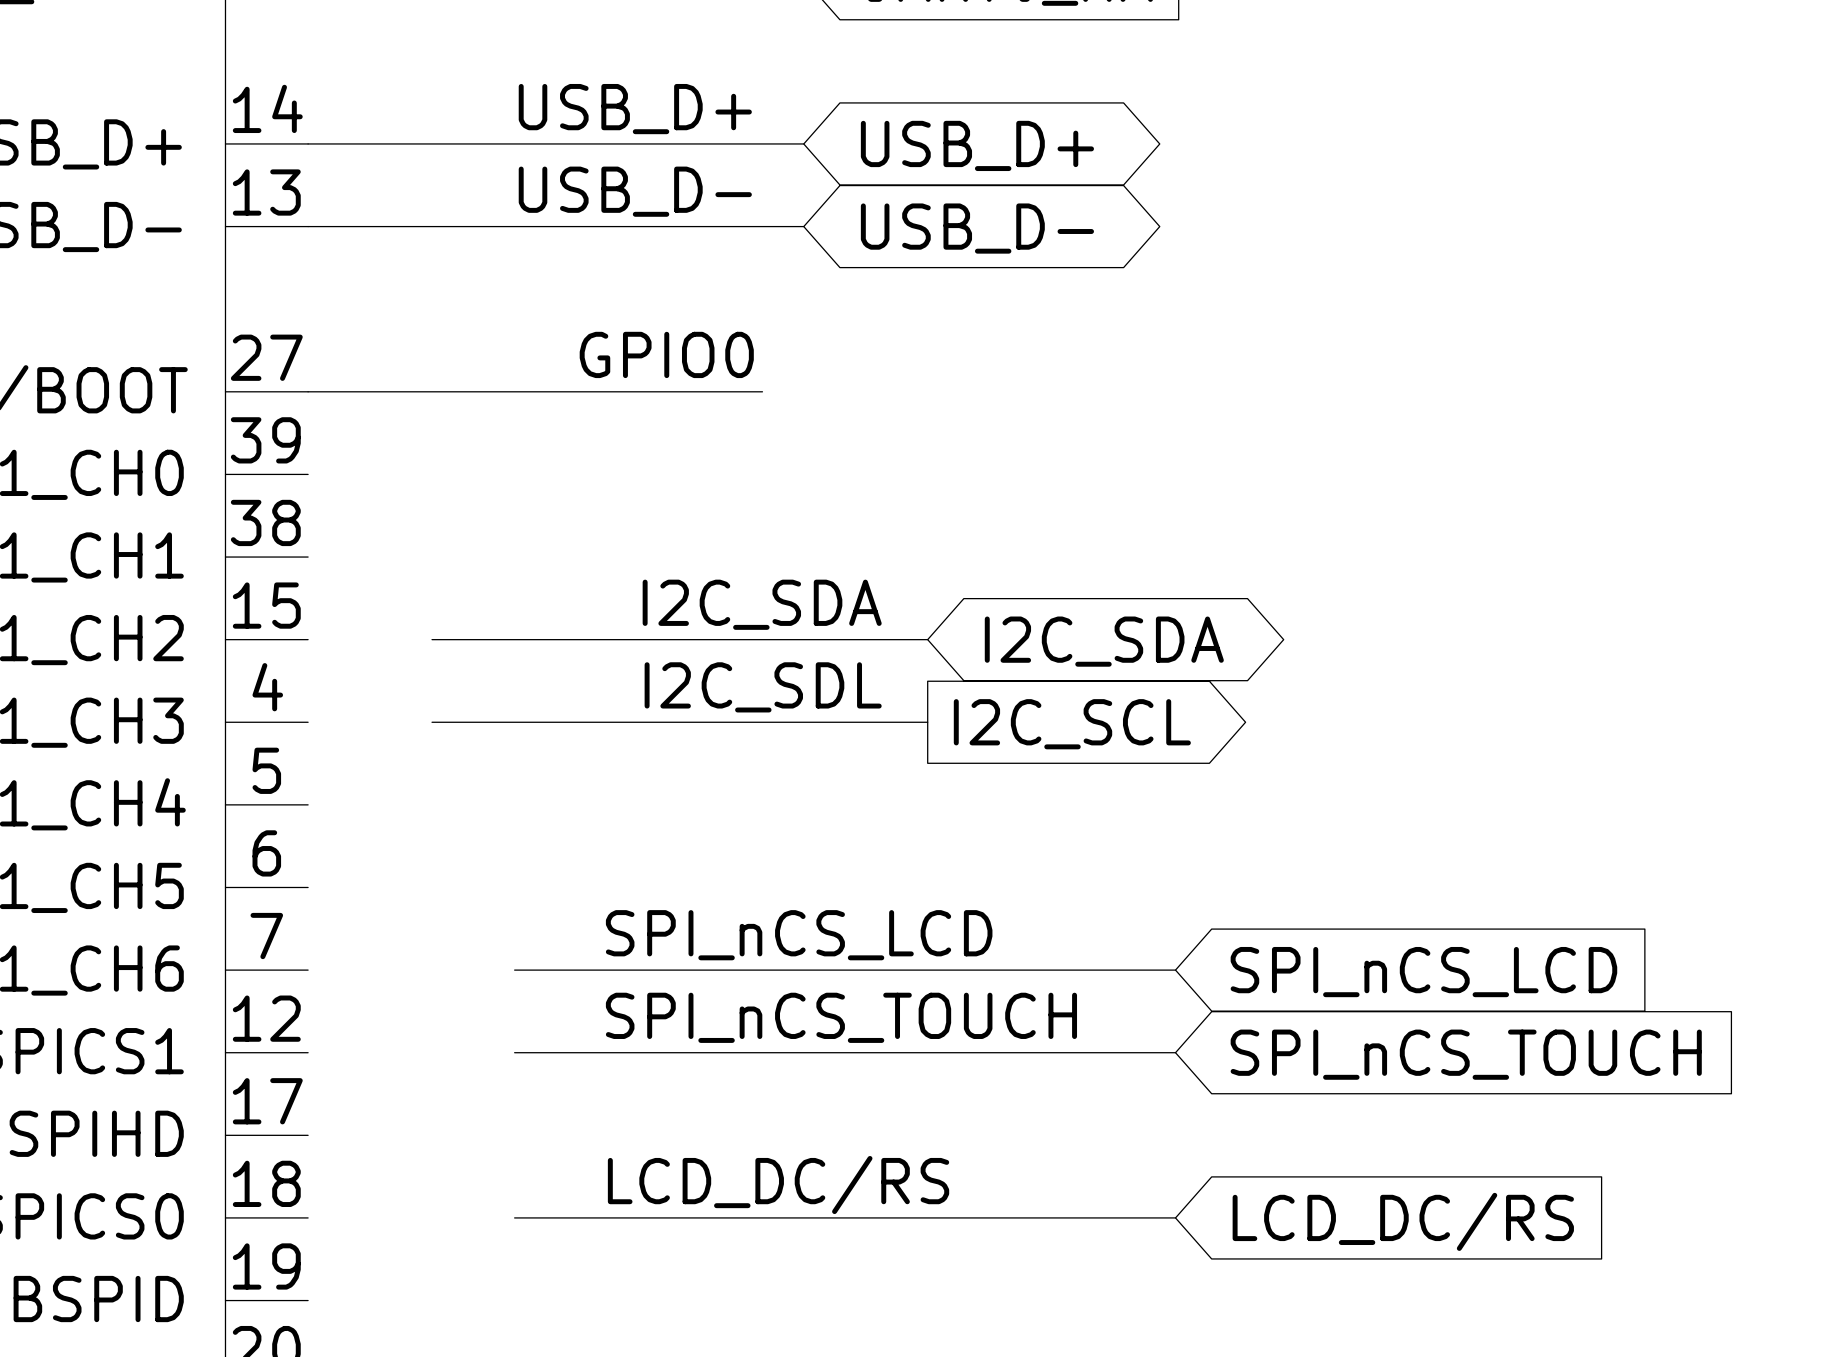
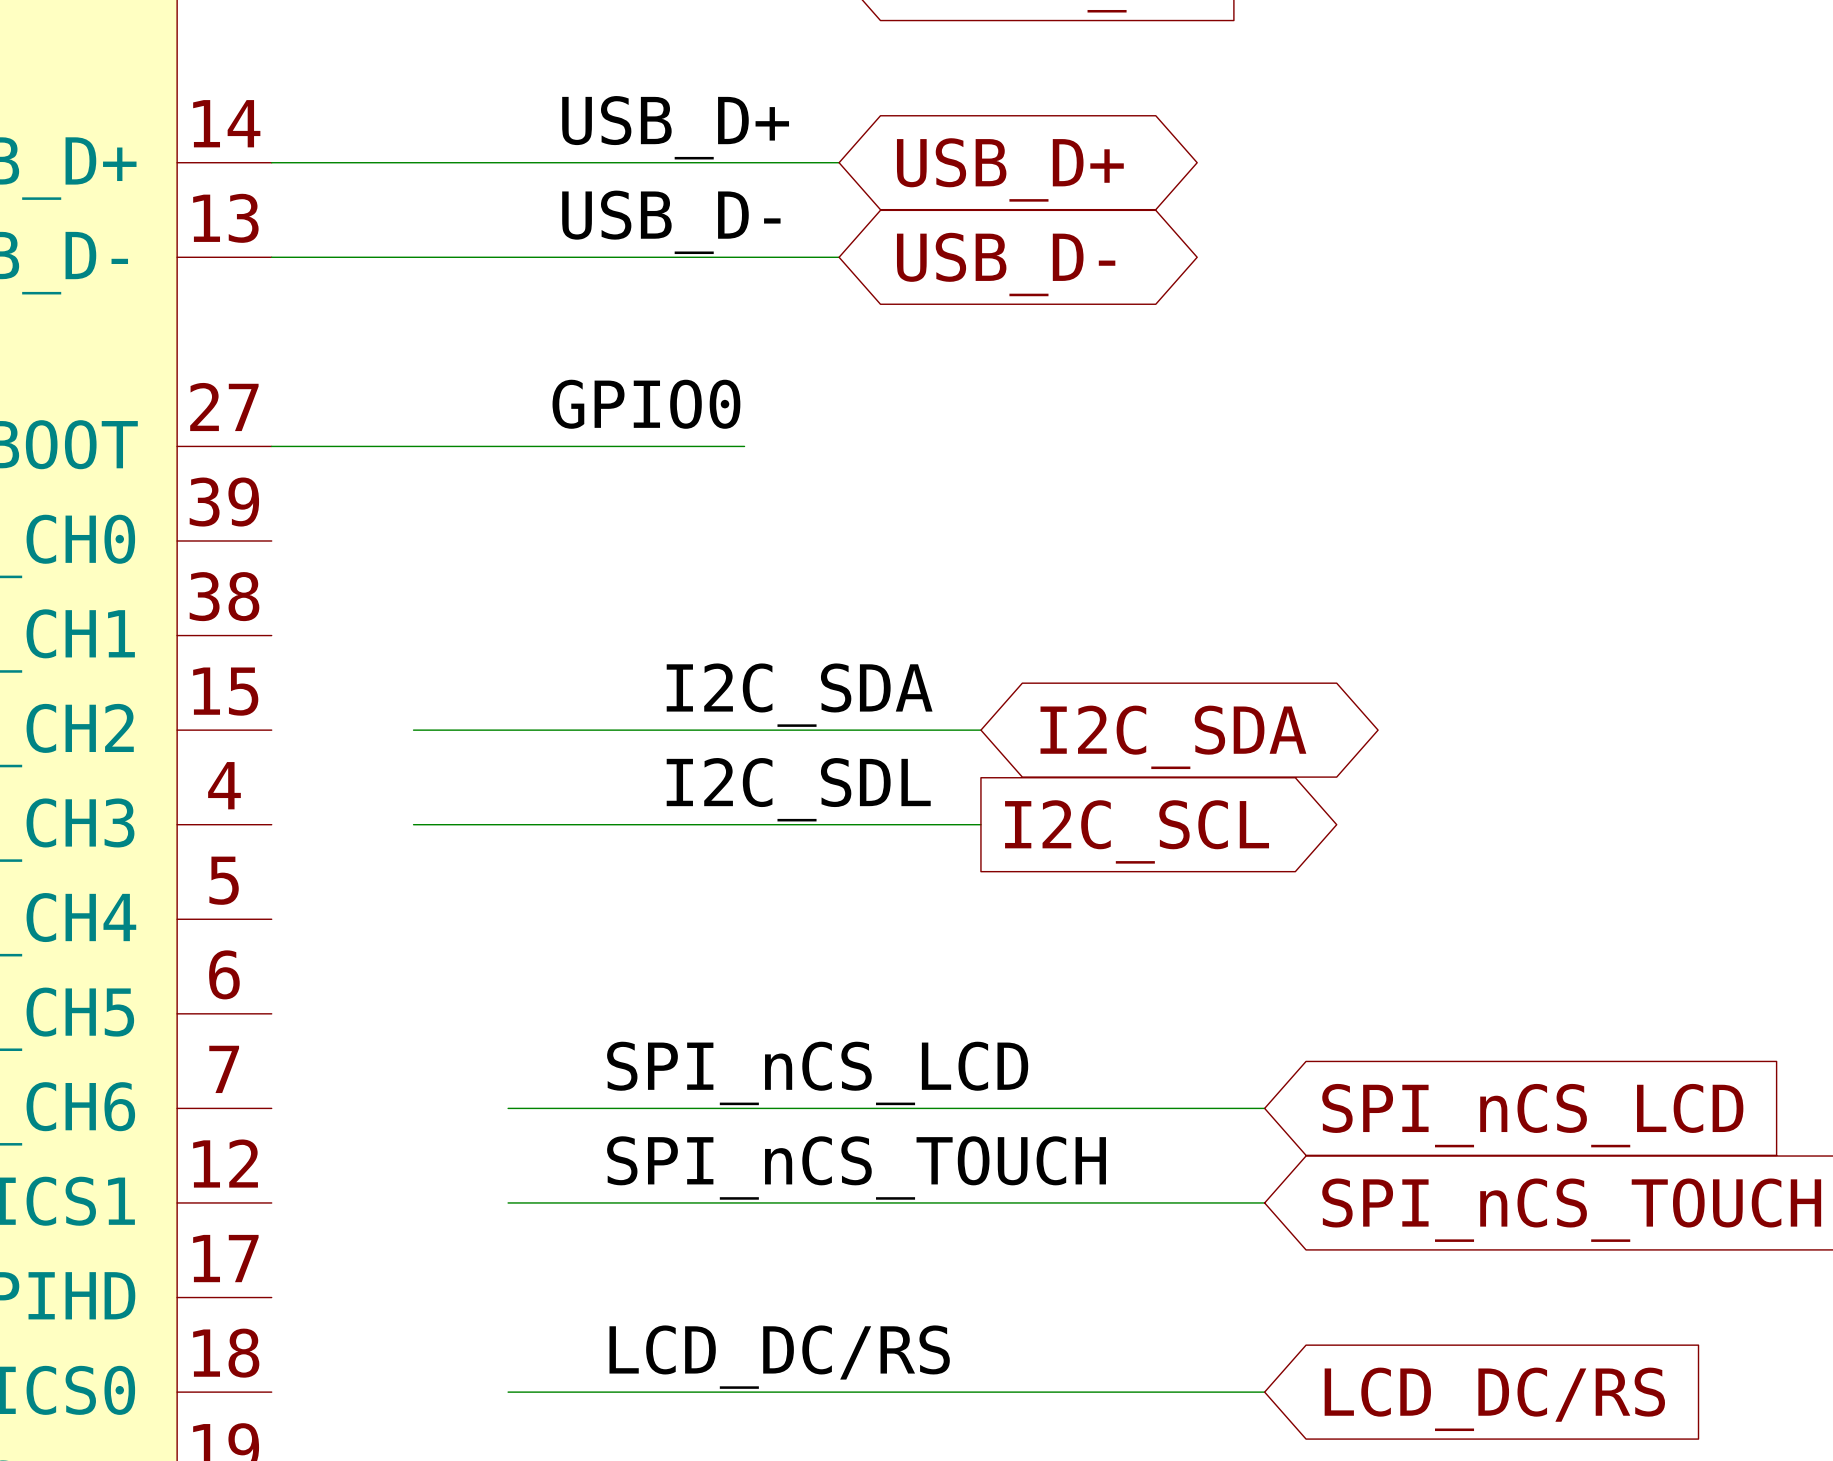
label position: GPIO0 (666, 354) -> GPIO0 (646, 404)
wire: (721, 391) (762, 391) -> none

